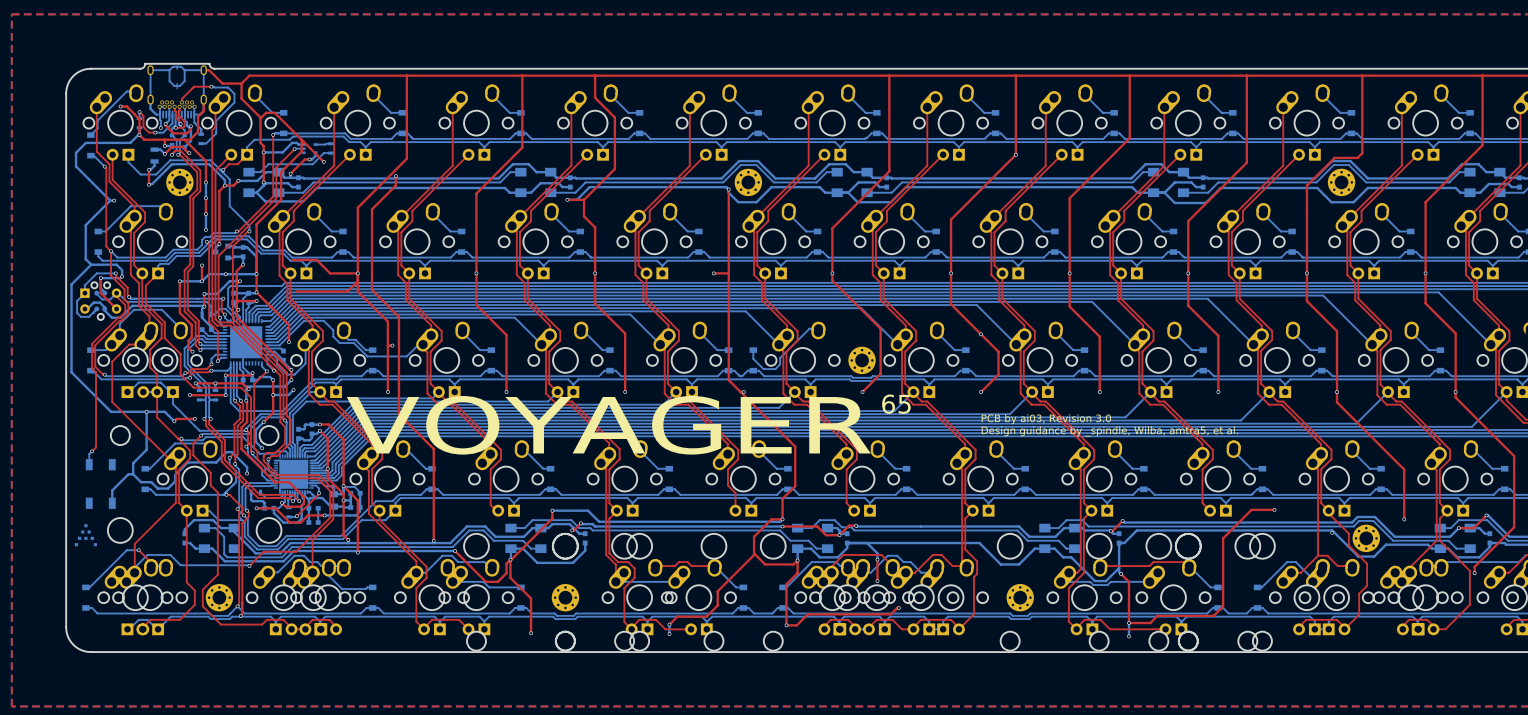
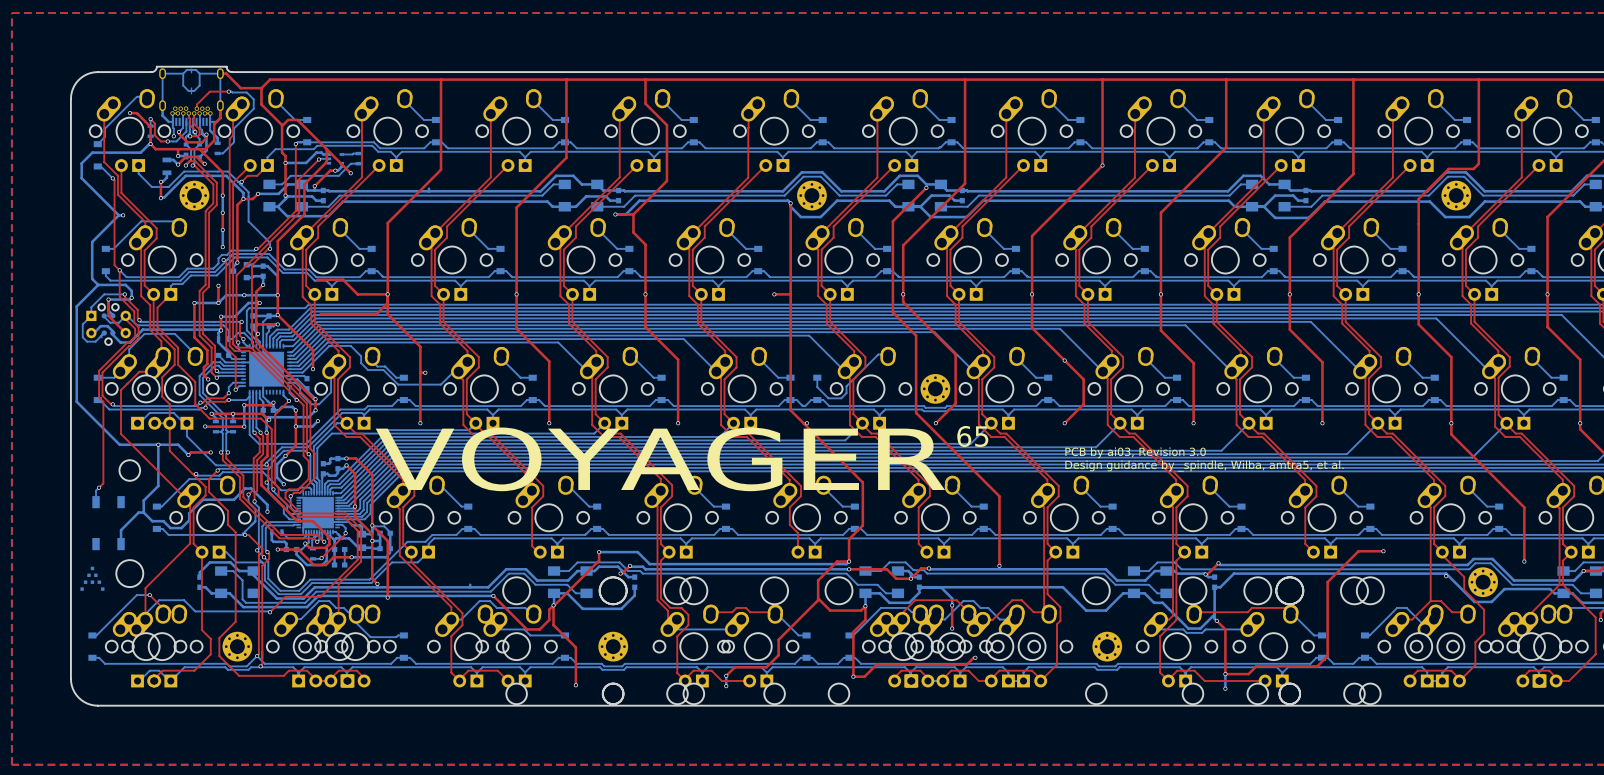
top track: none -> (926, 187) (892, 221) (892, 312) (916, 335) (916, 412) (999, 496) (999, 565)
via: none -> (926, 187)
top track: (395, 176) (395, 185) (372, 209) (372, 290) (398, 316) (398, 414) (433, 448) (433, 540) -> none
via: (395, 176) -> none
via: none -> (999, 565)
via: (433, 540) -> none

